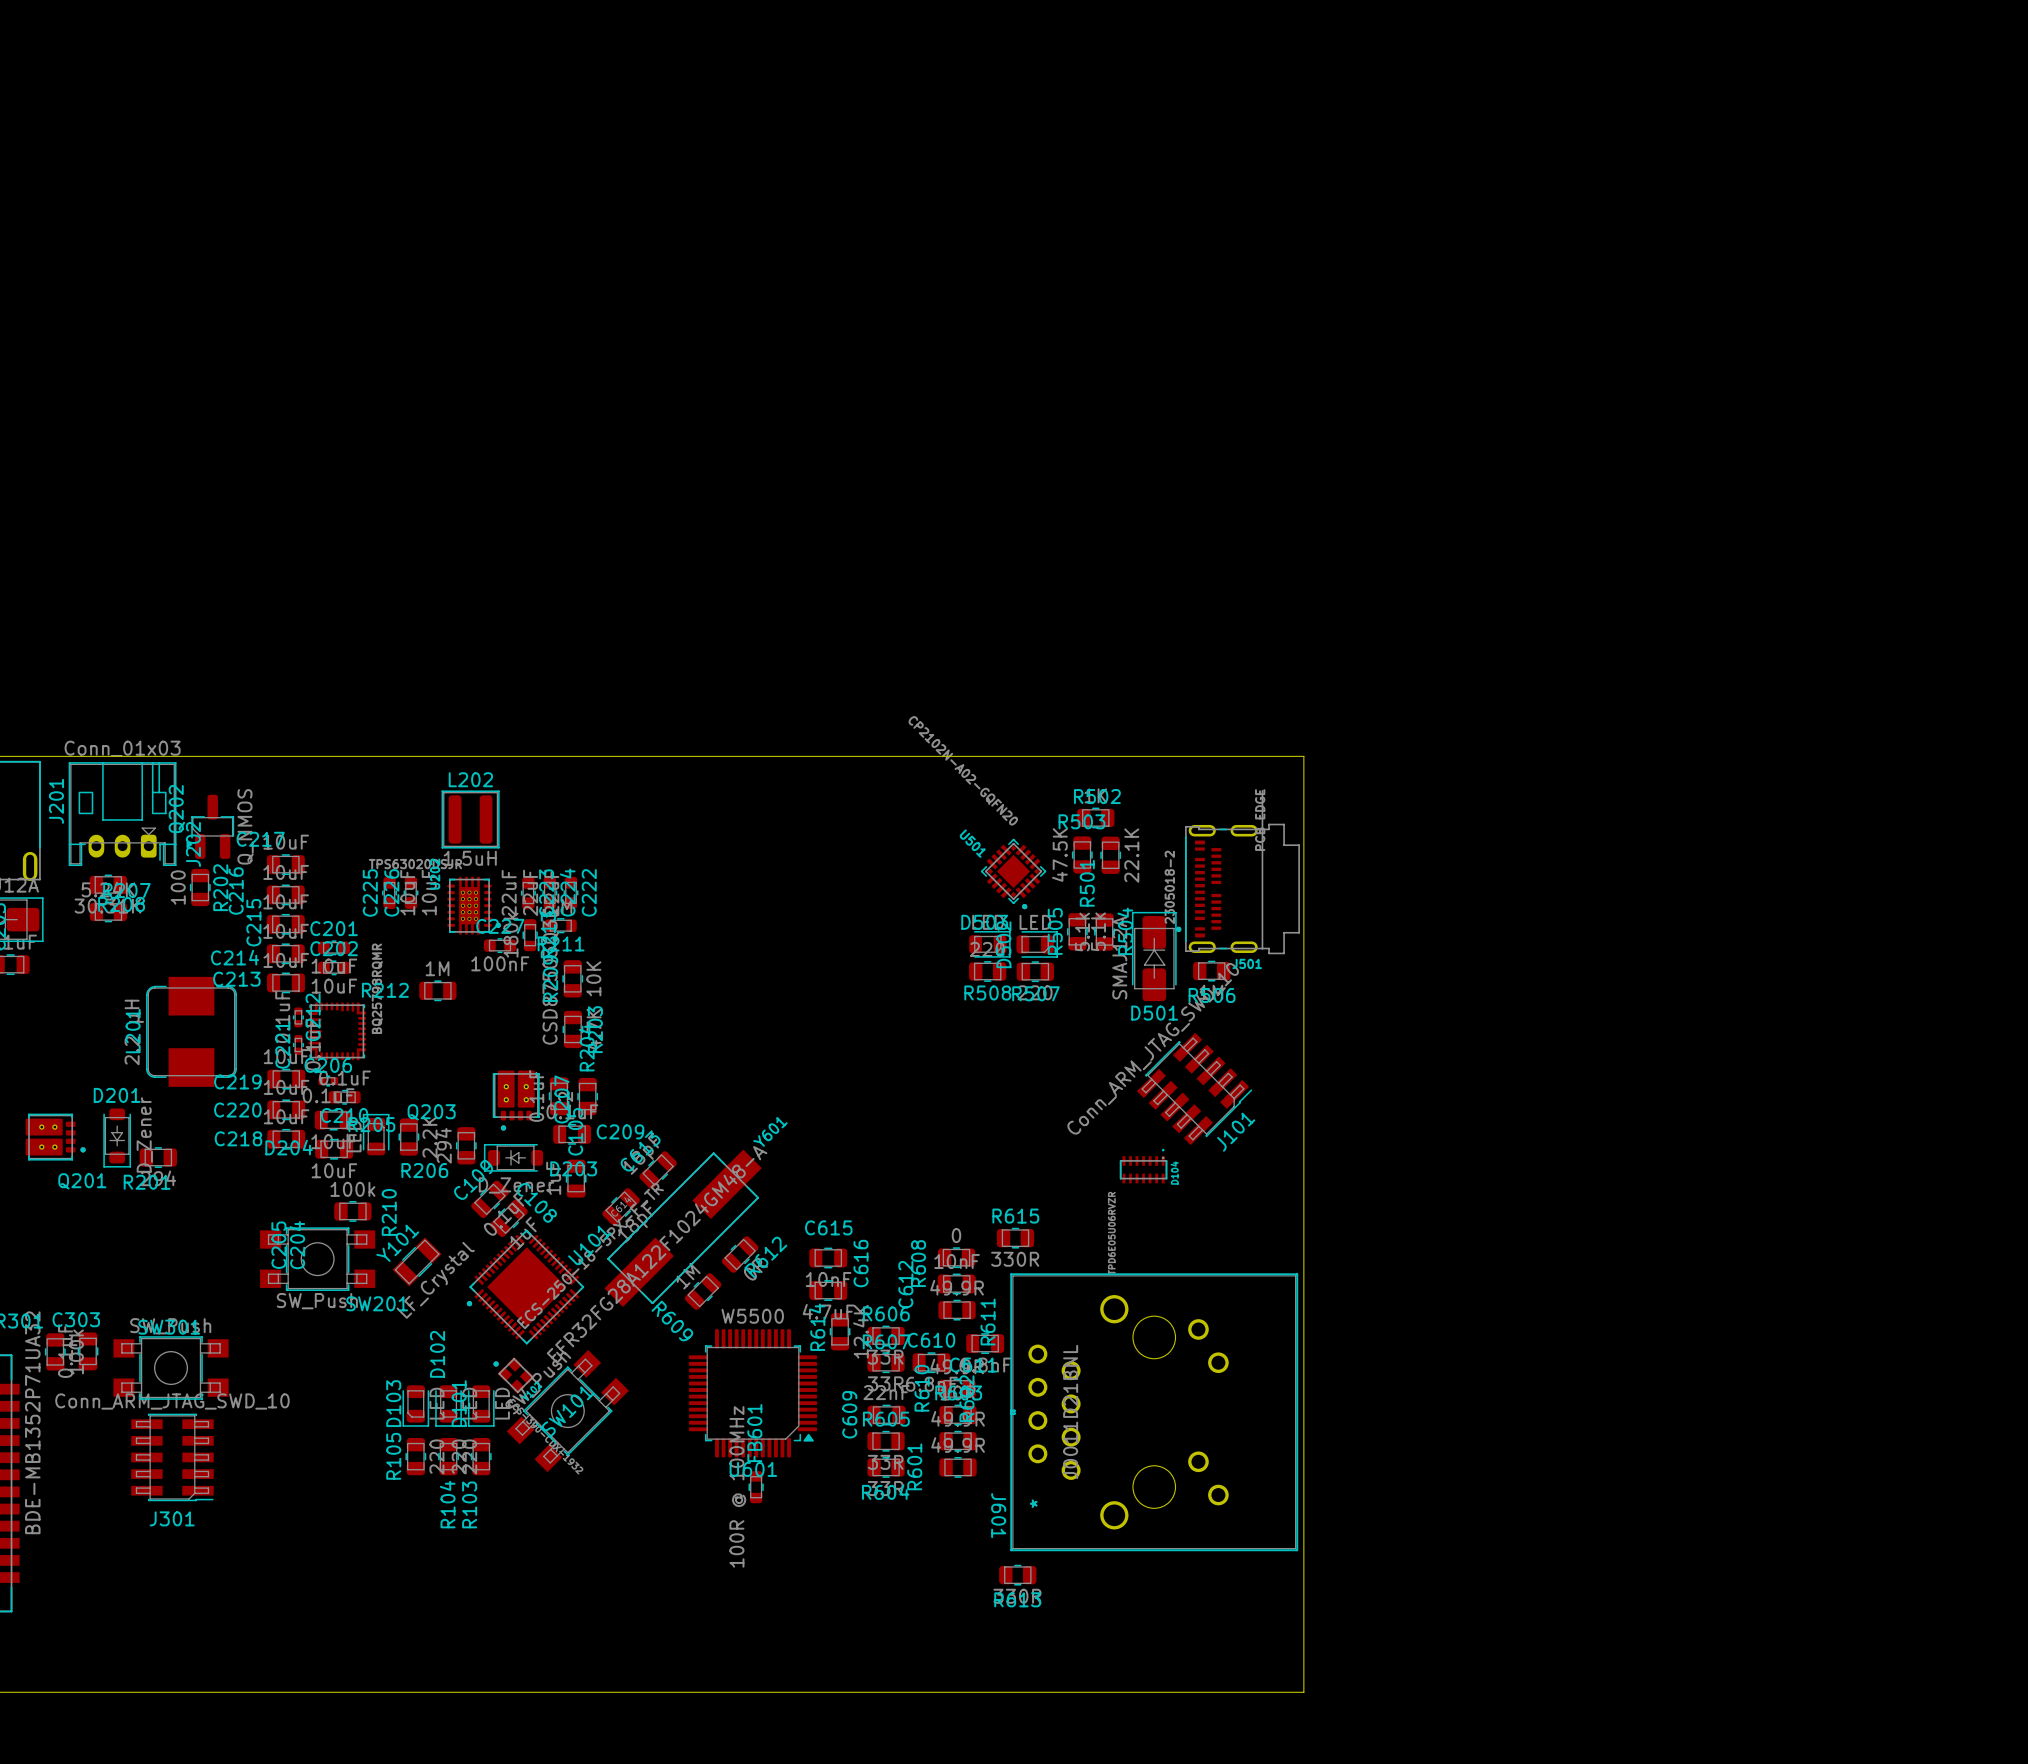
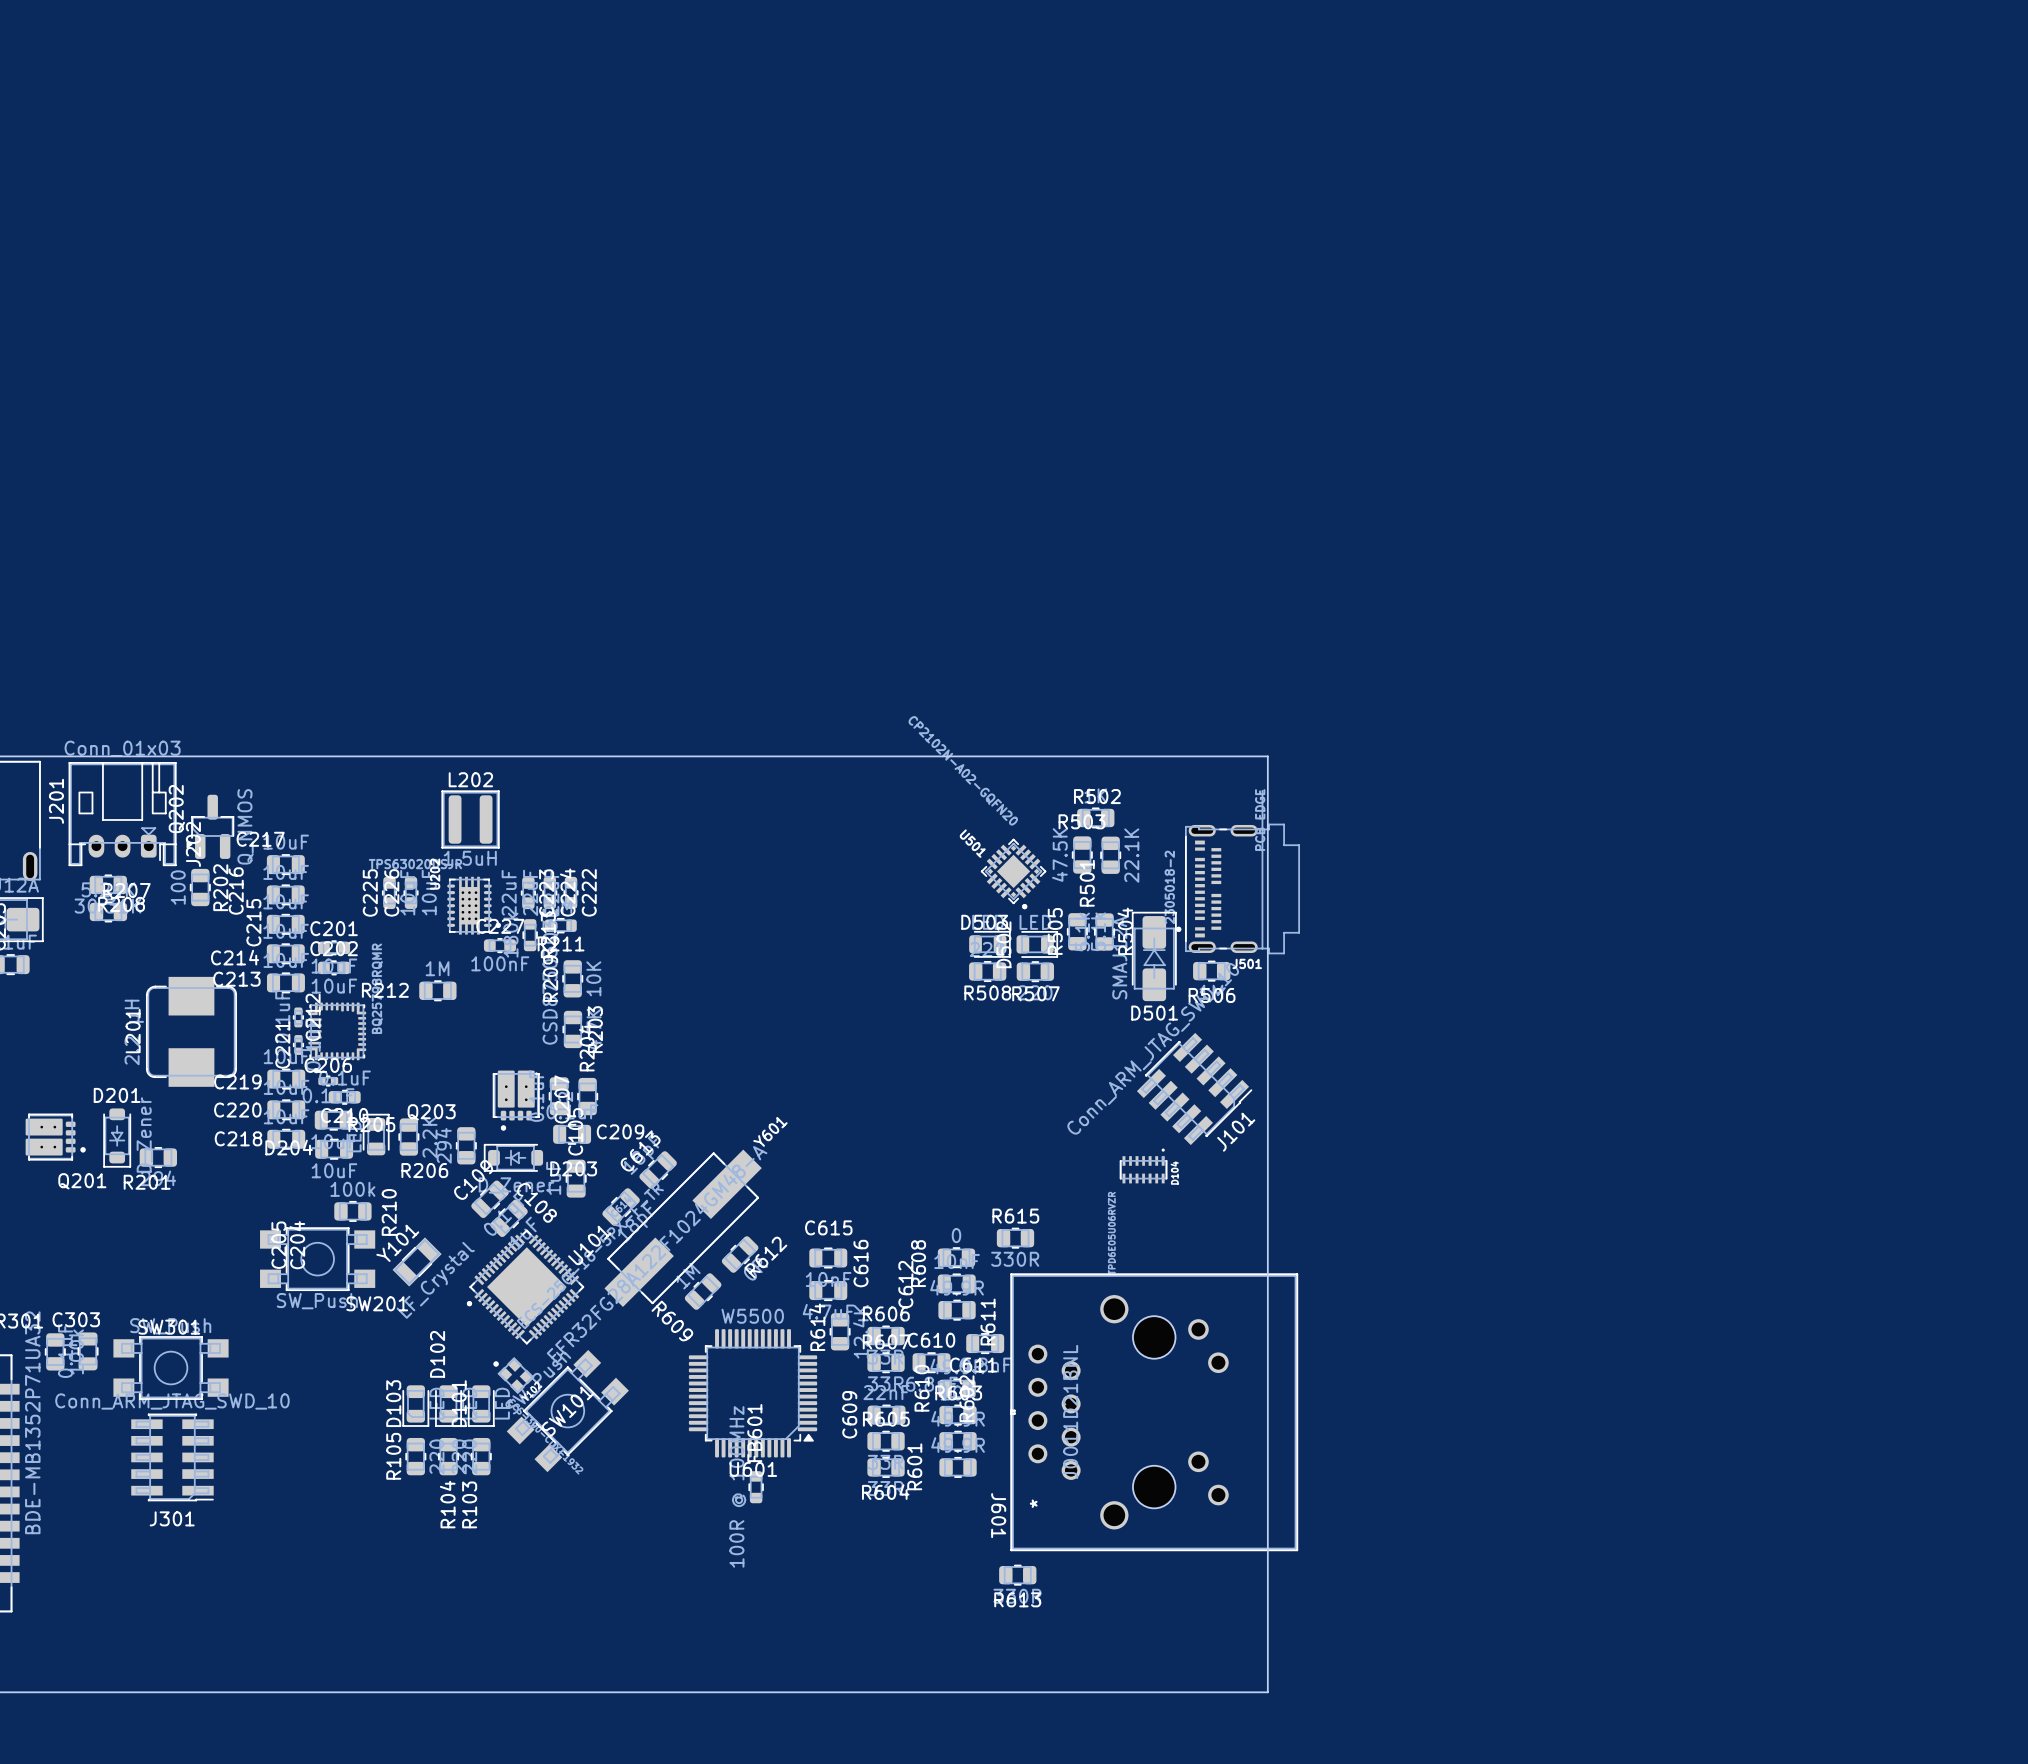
board edge: (1267, 756) (1303, 756) (1303, 1692) (1267, 1692) -> (1267, 756) (1267, 1692)

